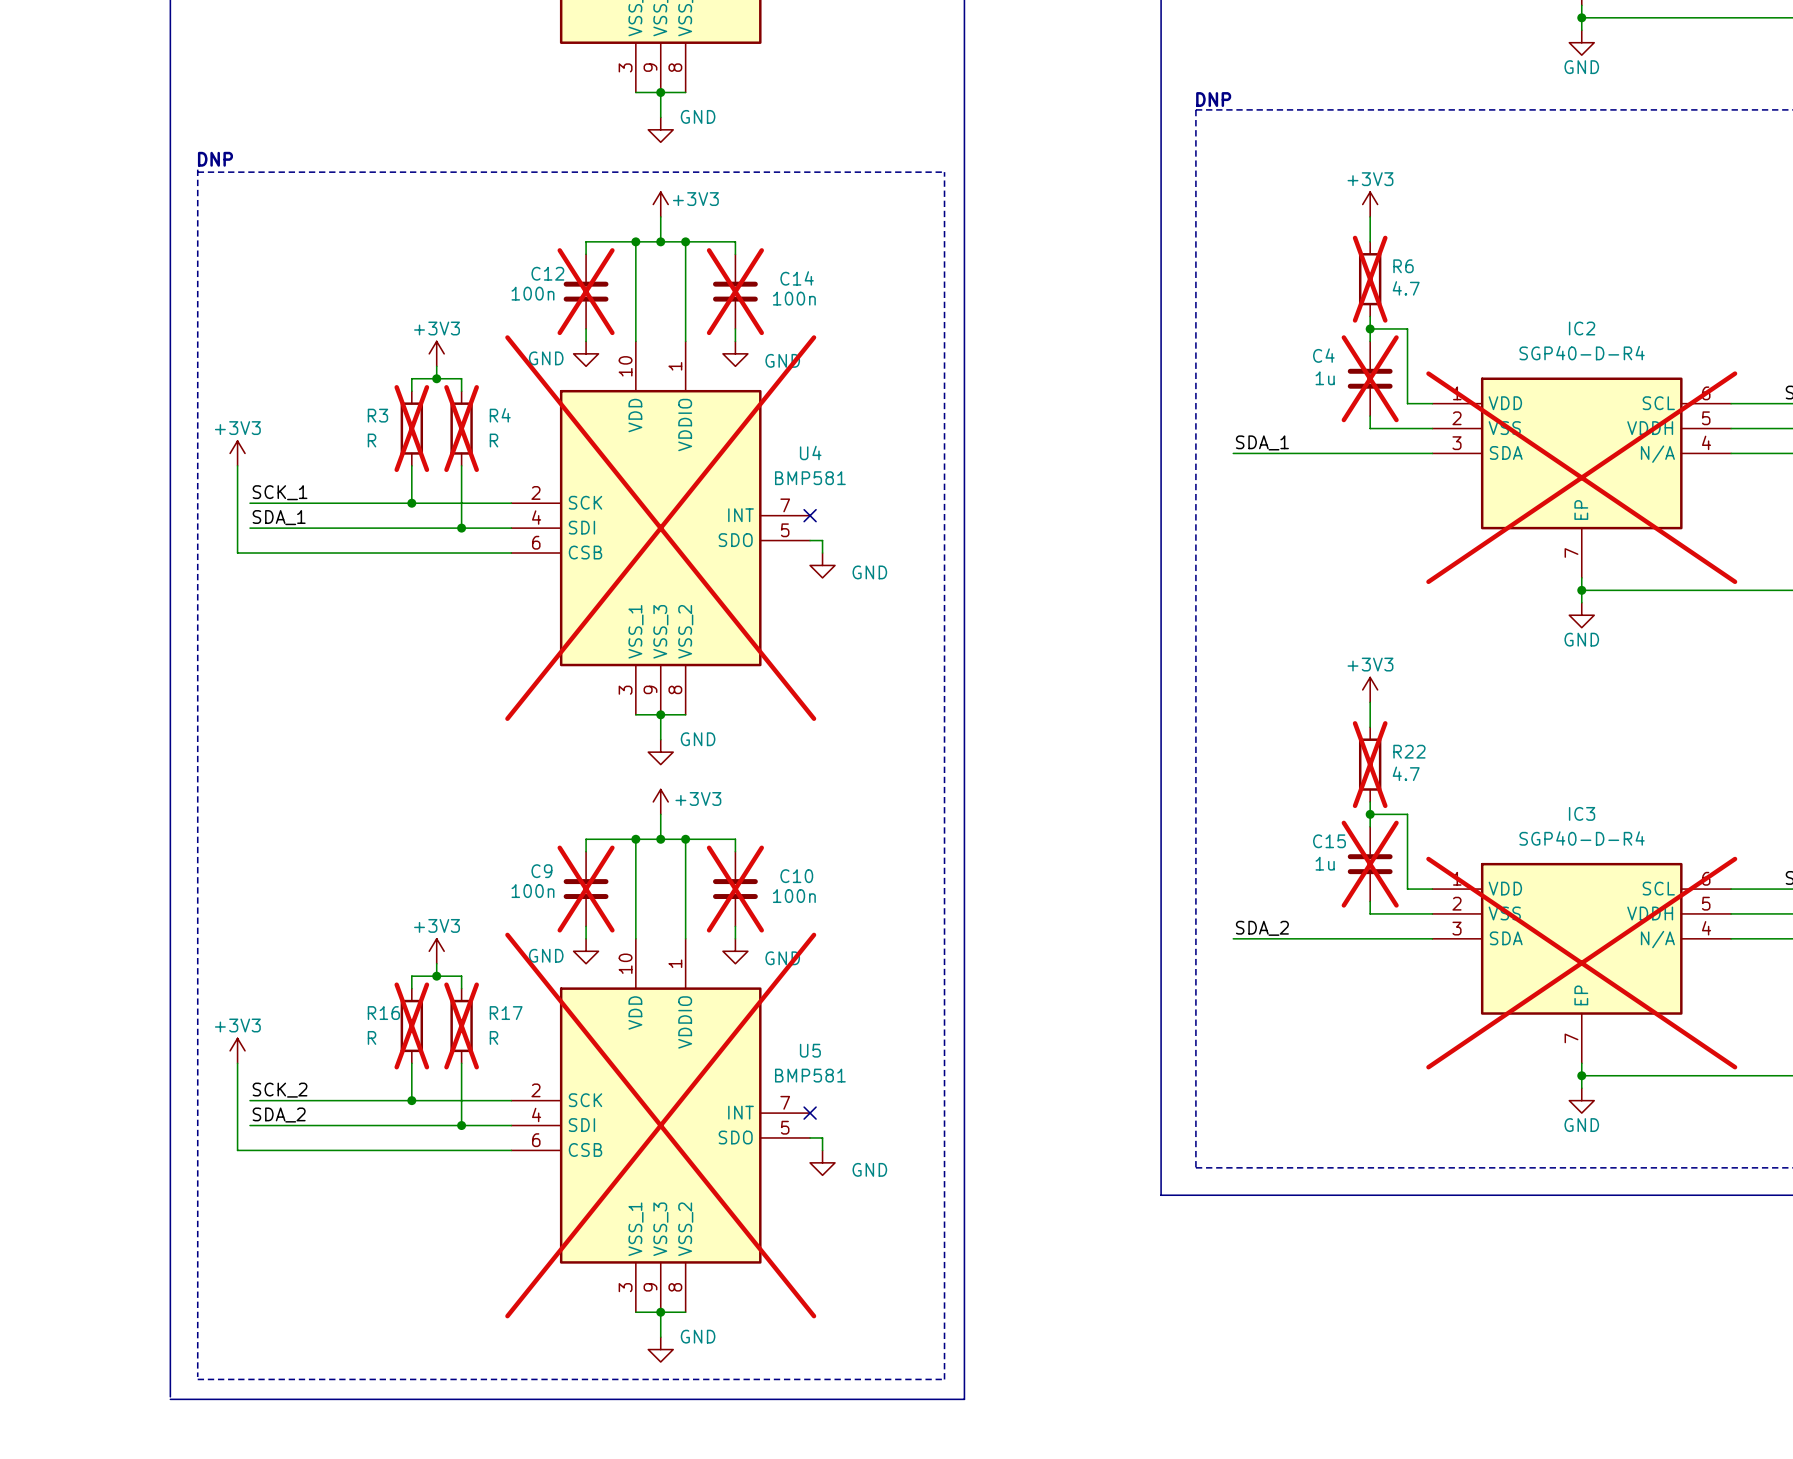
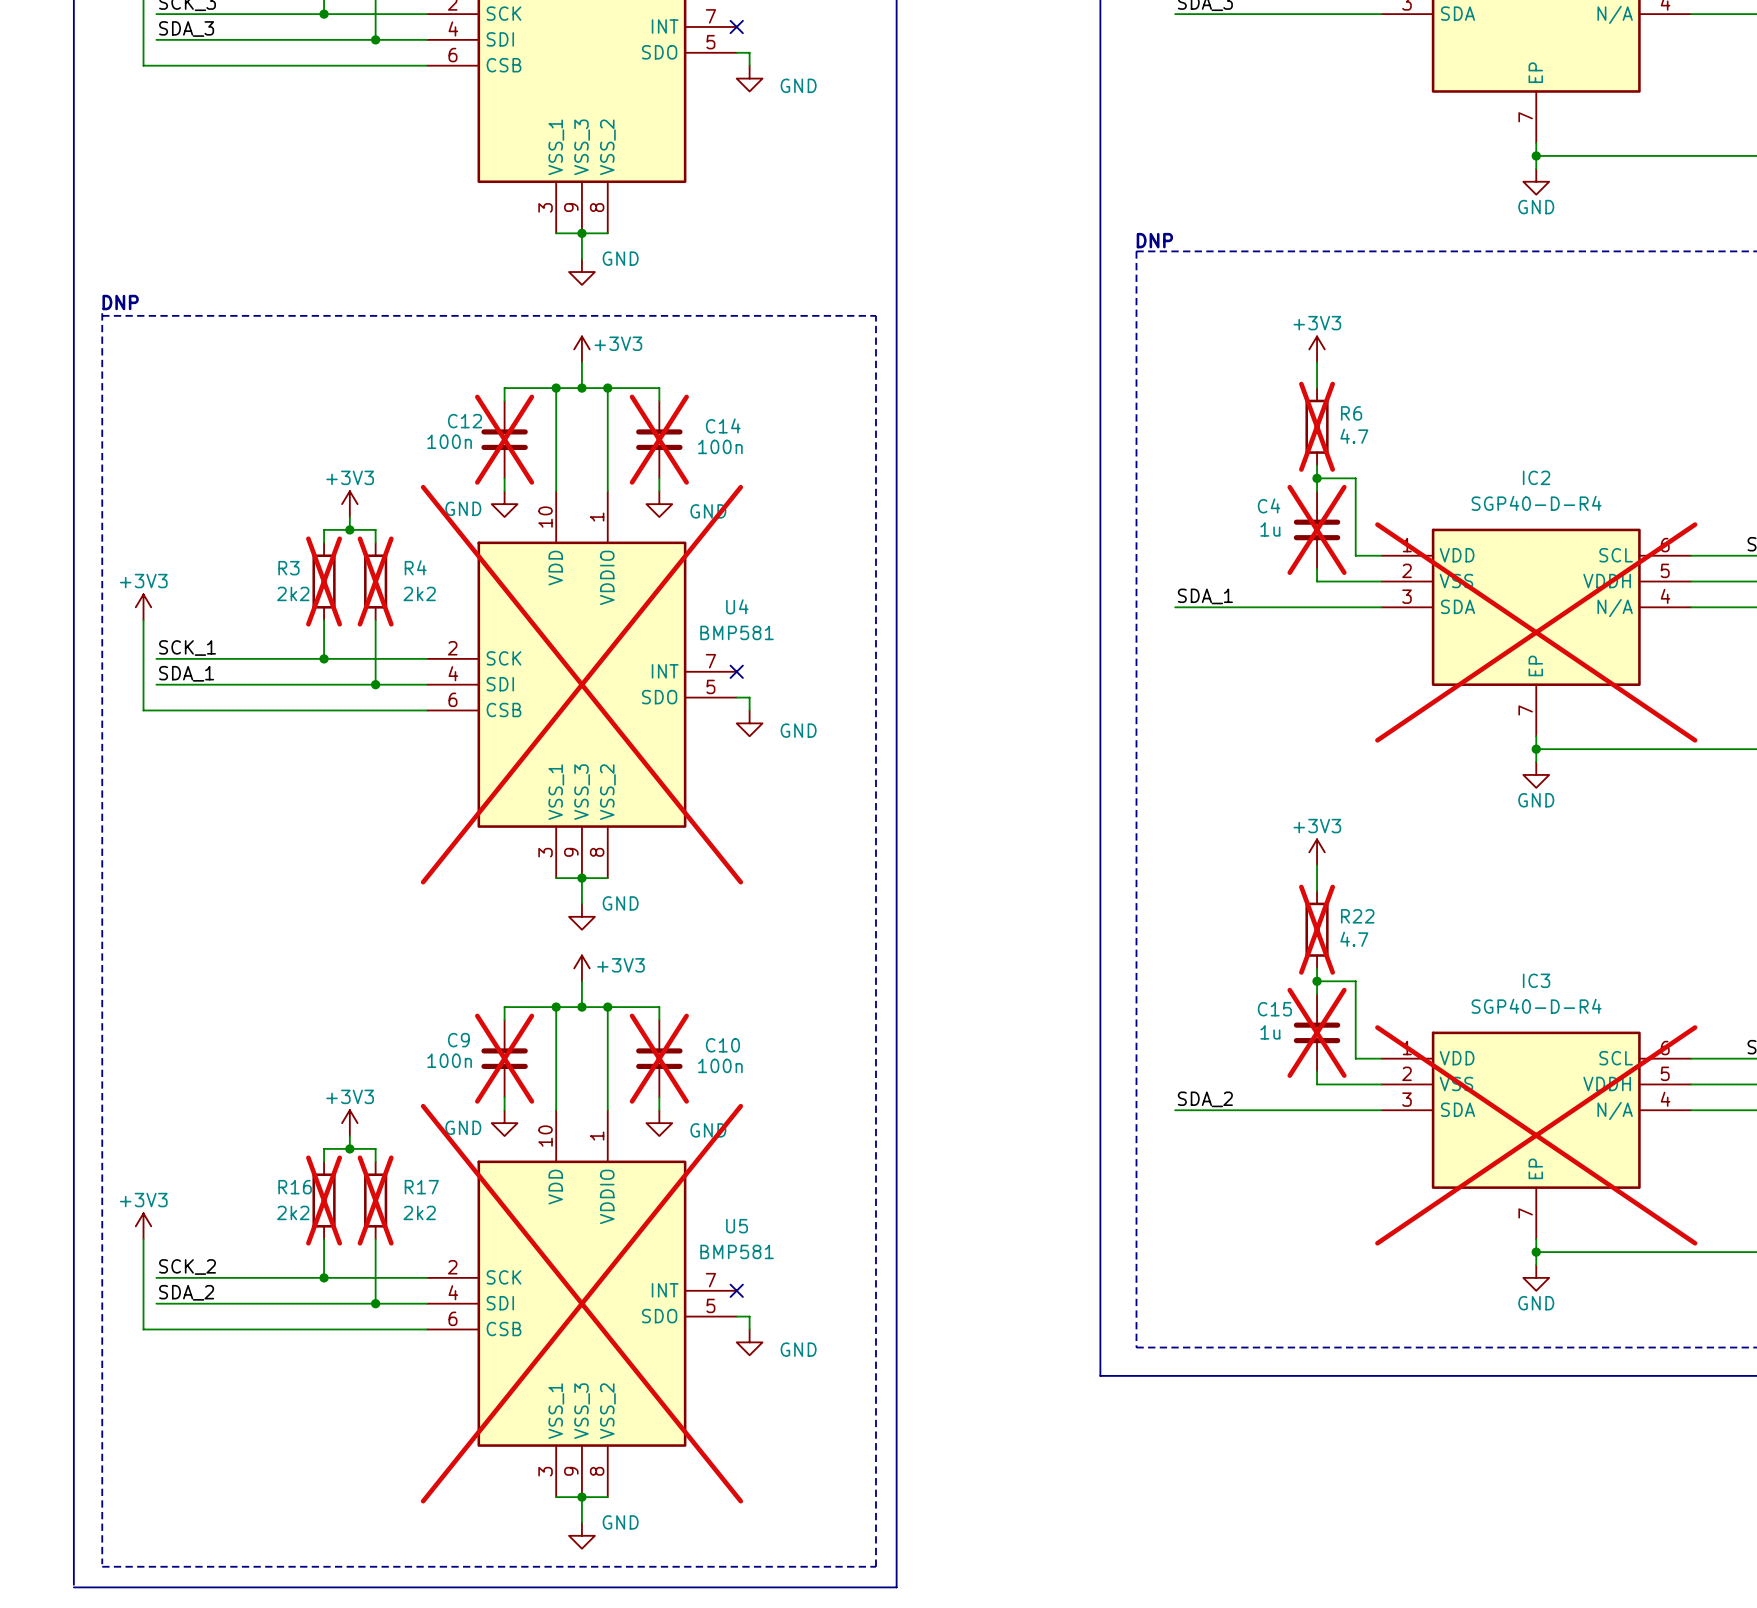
R3 value: R (372, 440) -> 2k2 (293, 593)
R4 value: R (493, 440) -> 2k2 (419, 593)
R16 value: R (372, 1037) -> 2k2 (293, 1212)
R17 value: R (493, 1037) -> 2k2 (419, 1212)

